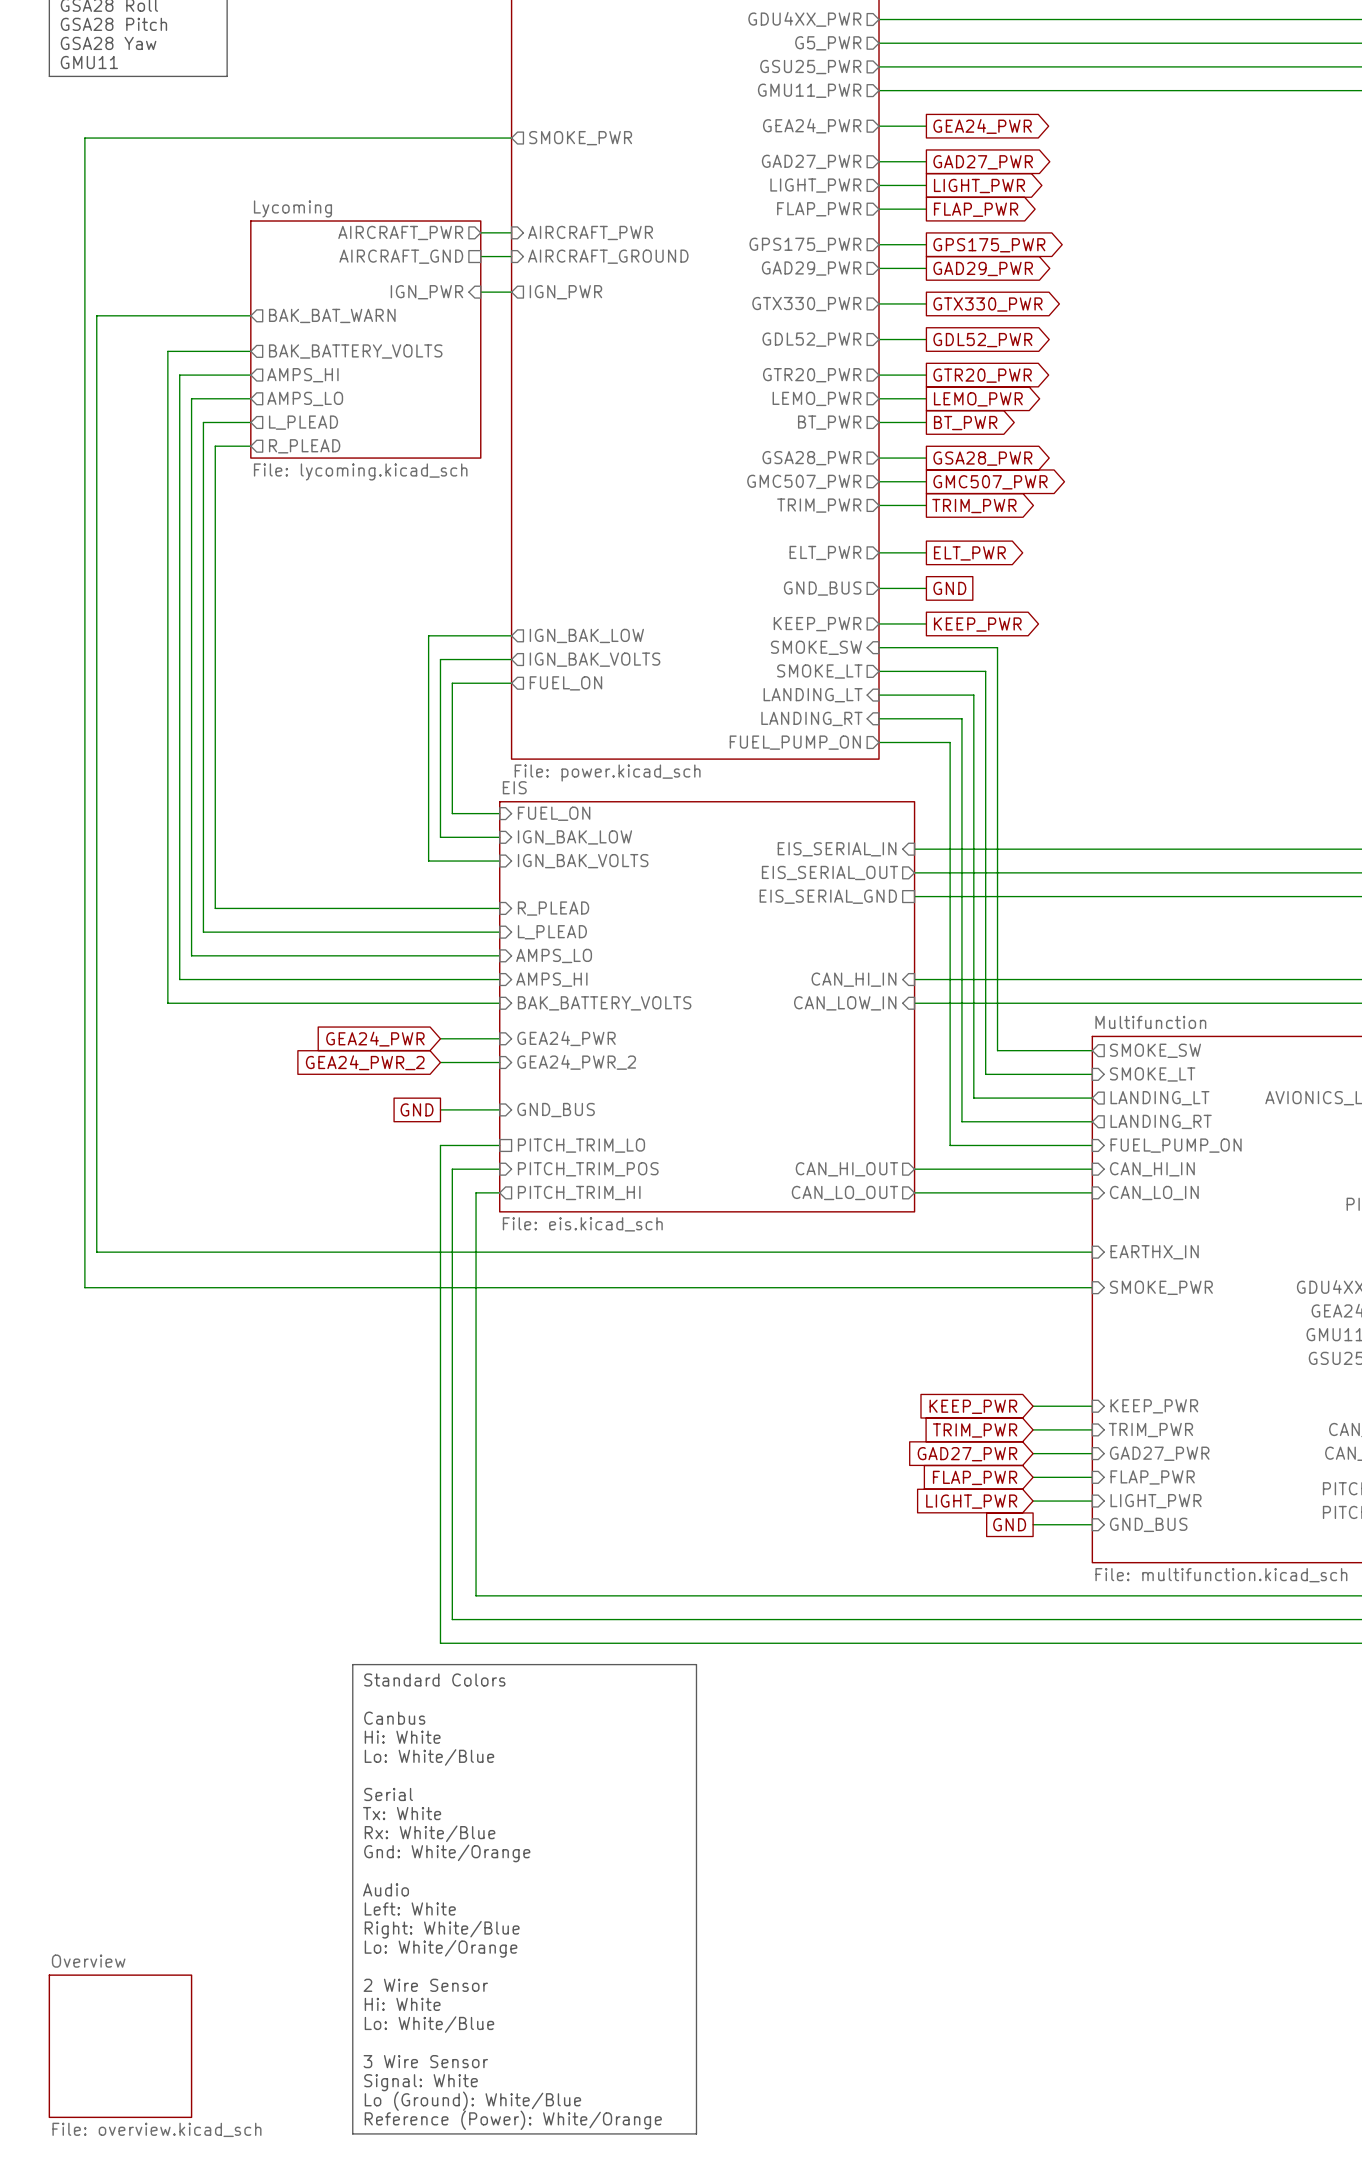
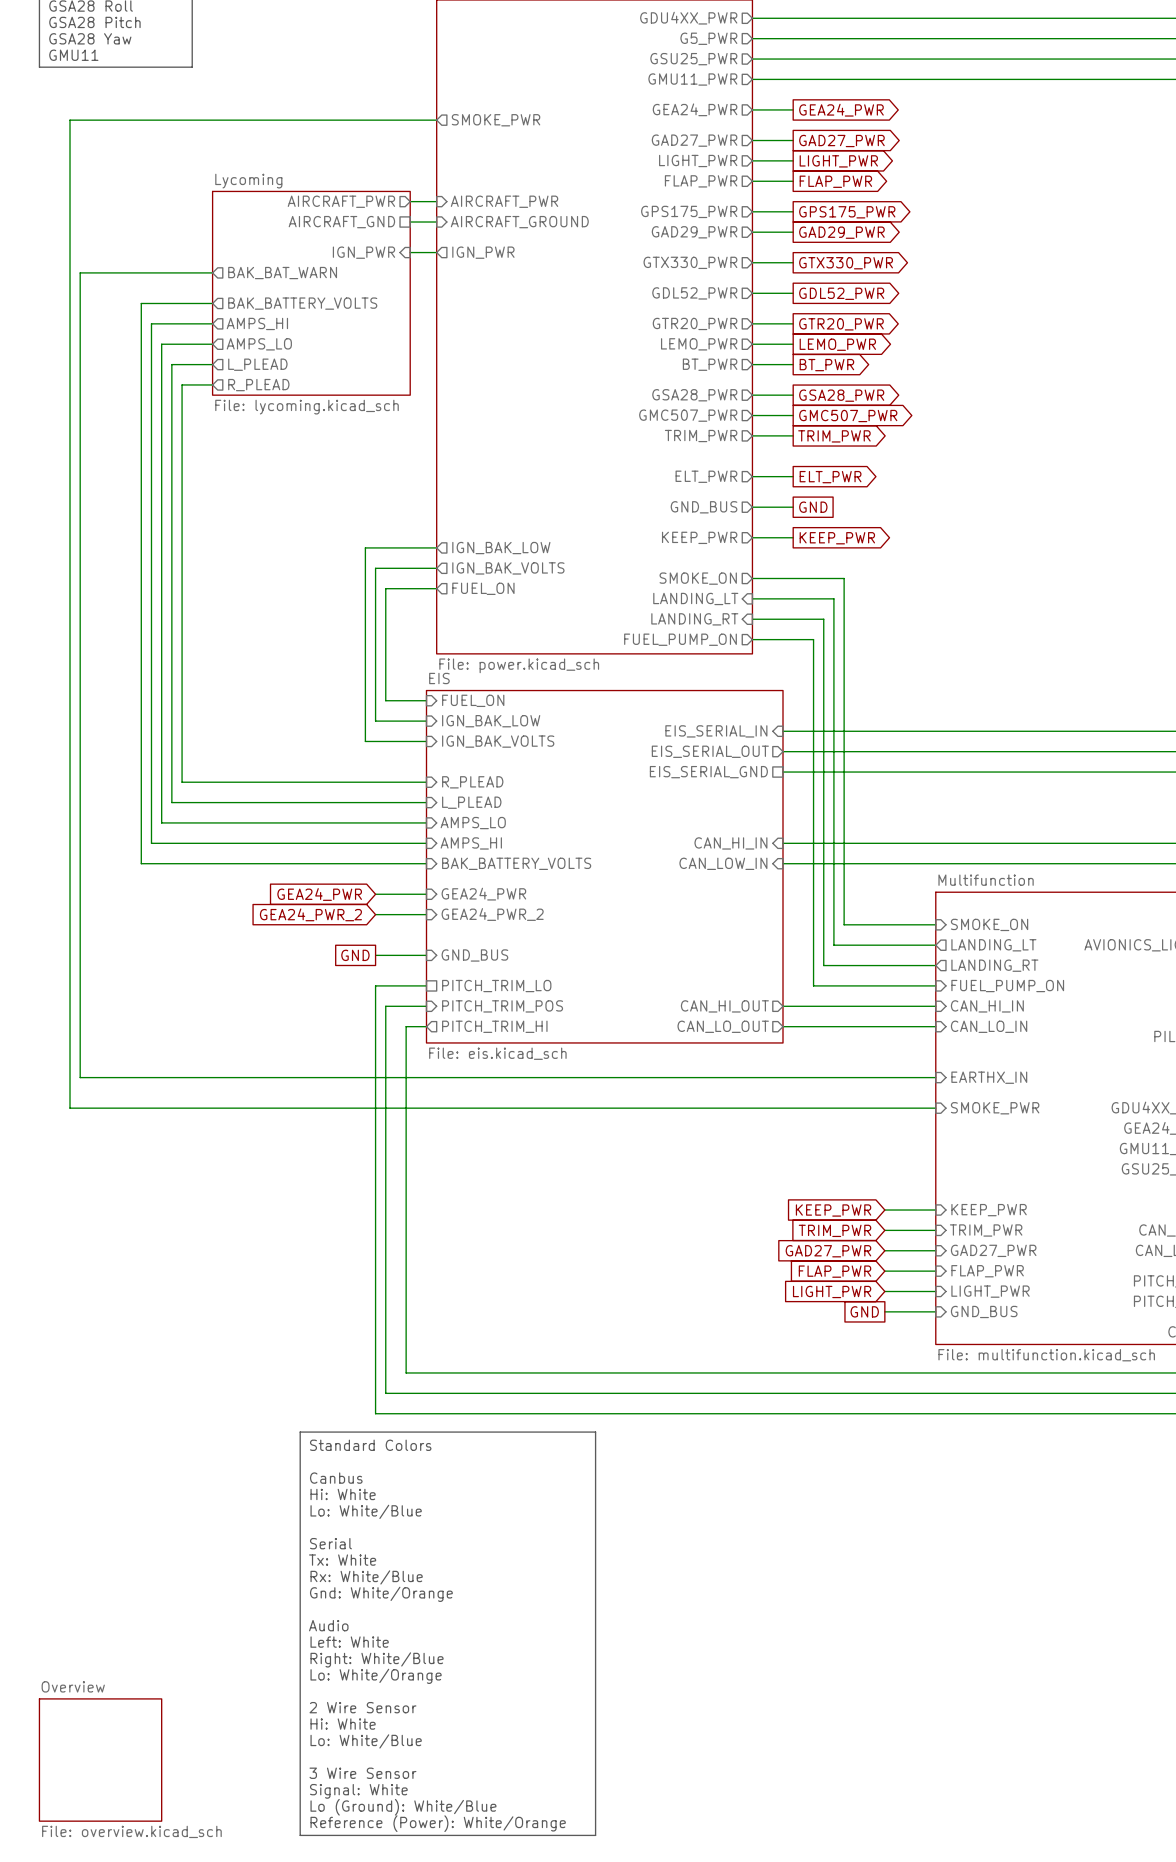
sheet pin: SMOKE_SW (816, 647) -> none
wire: (879, 647) (997, 647) (997, 1050) (1092, 1050) -> none
sheet pin: SMOKE_LT (819, 671) -> SMOKE_ON (698, 578)
sheet pin: SMOKE_SW (1155, 1050) -> none
sheet pin: SMOKE_LT (1152, 1074) -> SMOKE_ON (989, 924)

